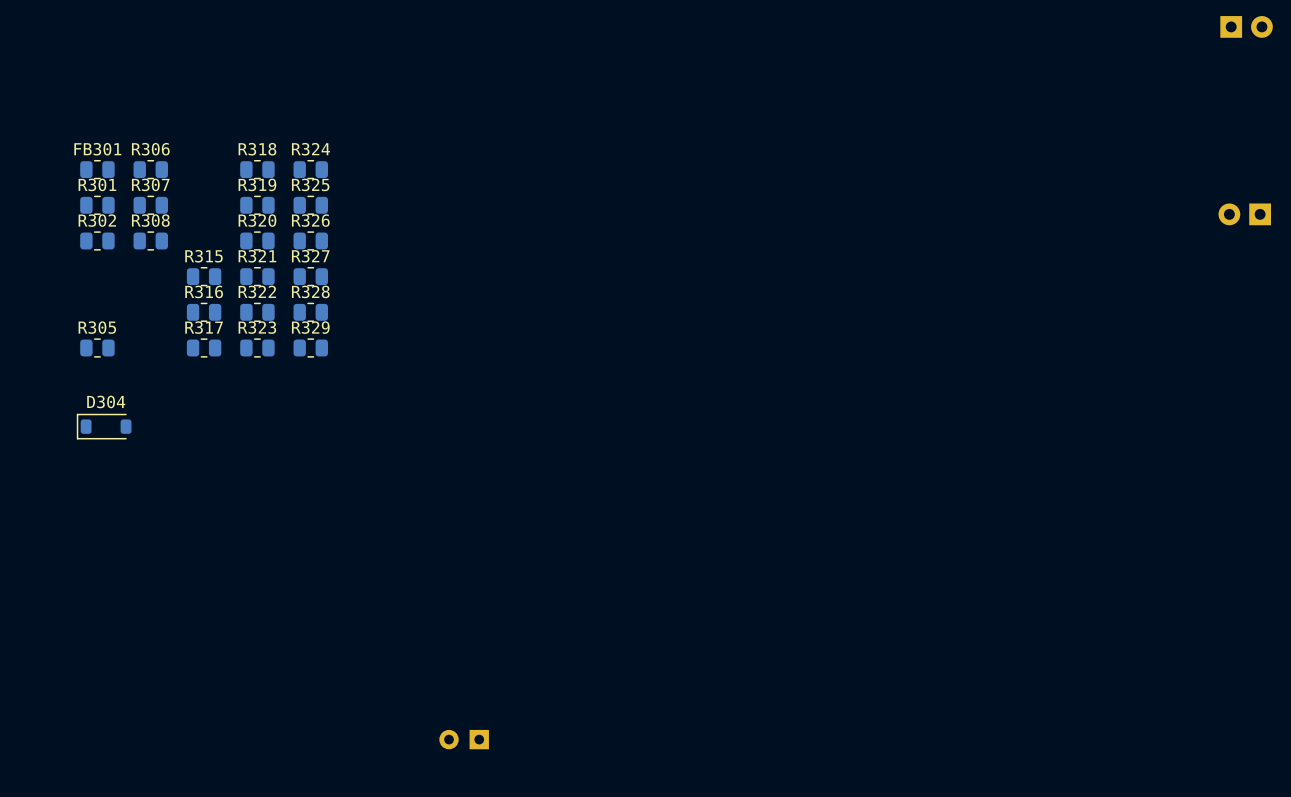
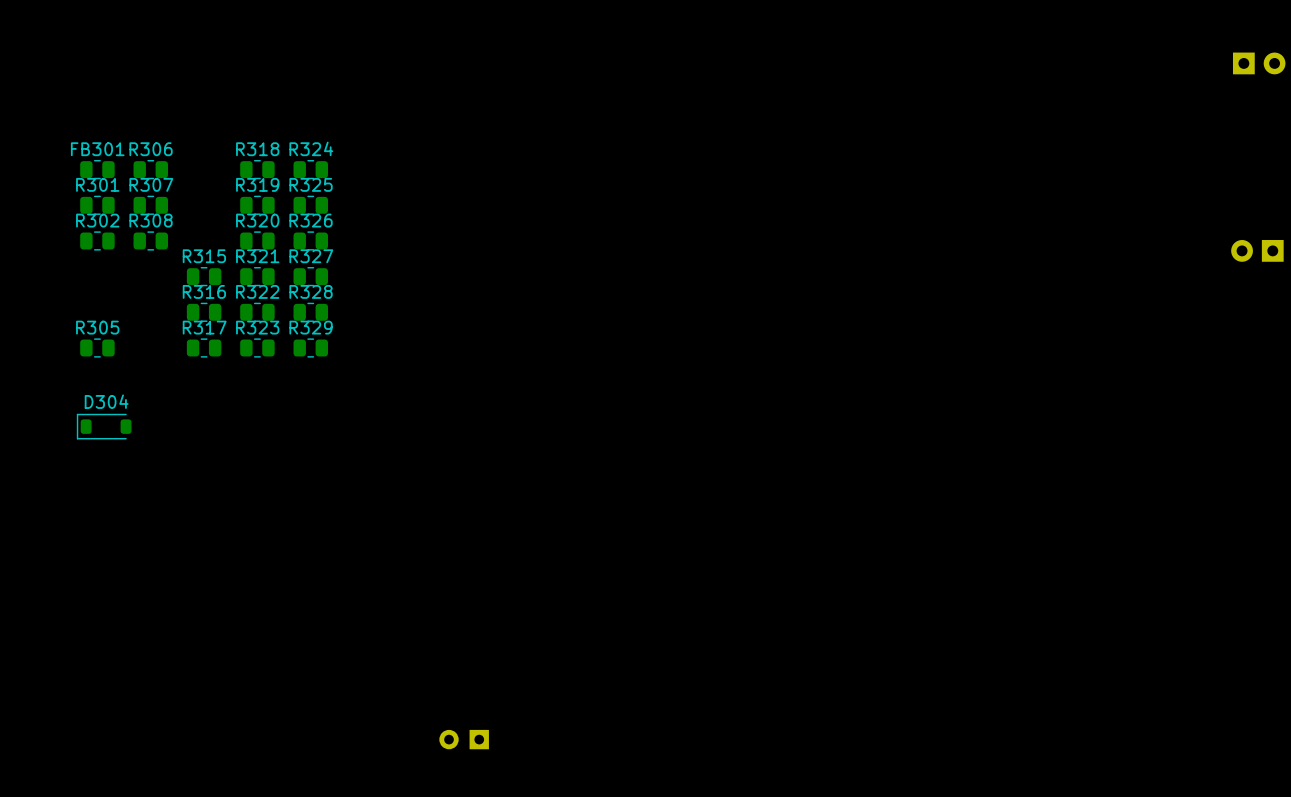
part: (1246, 26) -> none
part: none -> (1259, 63)
part position: (1244, 214) -> (1257, 250)

